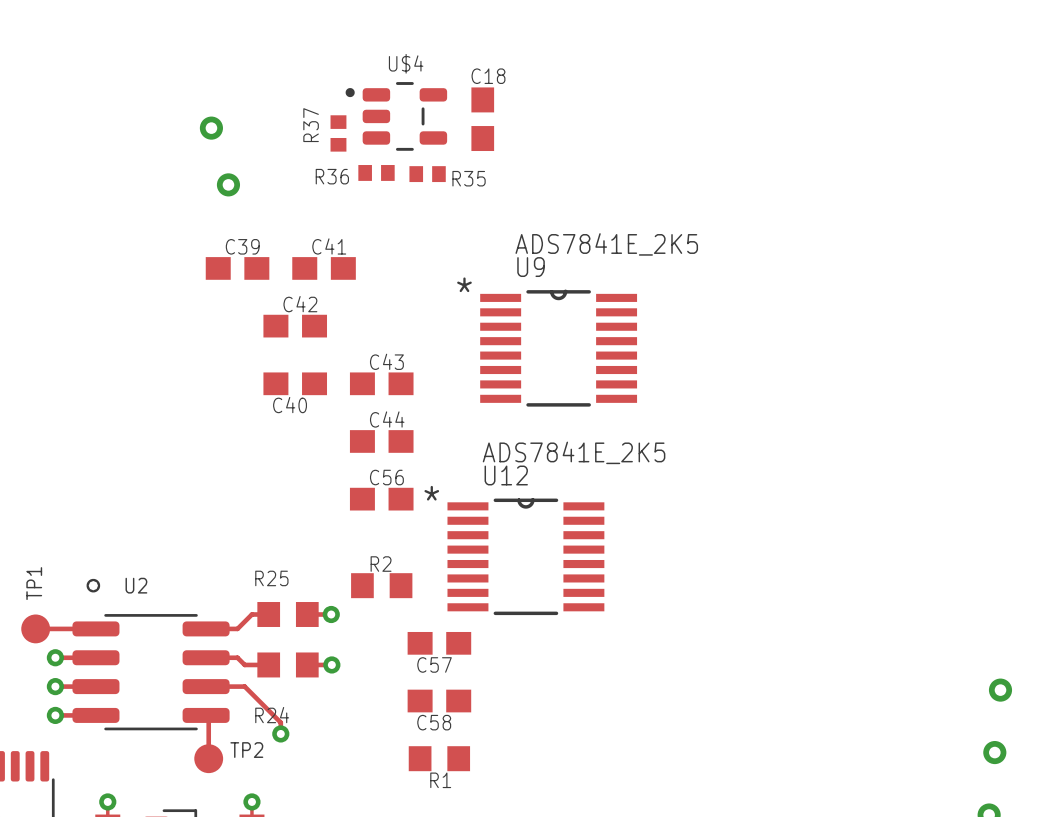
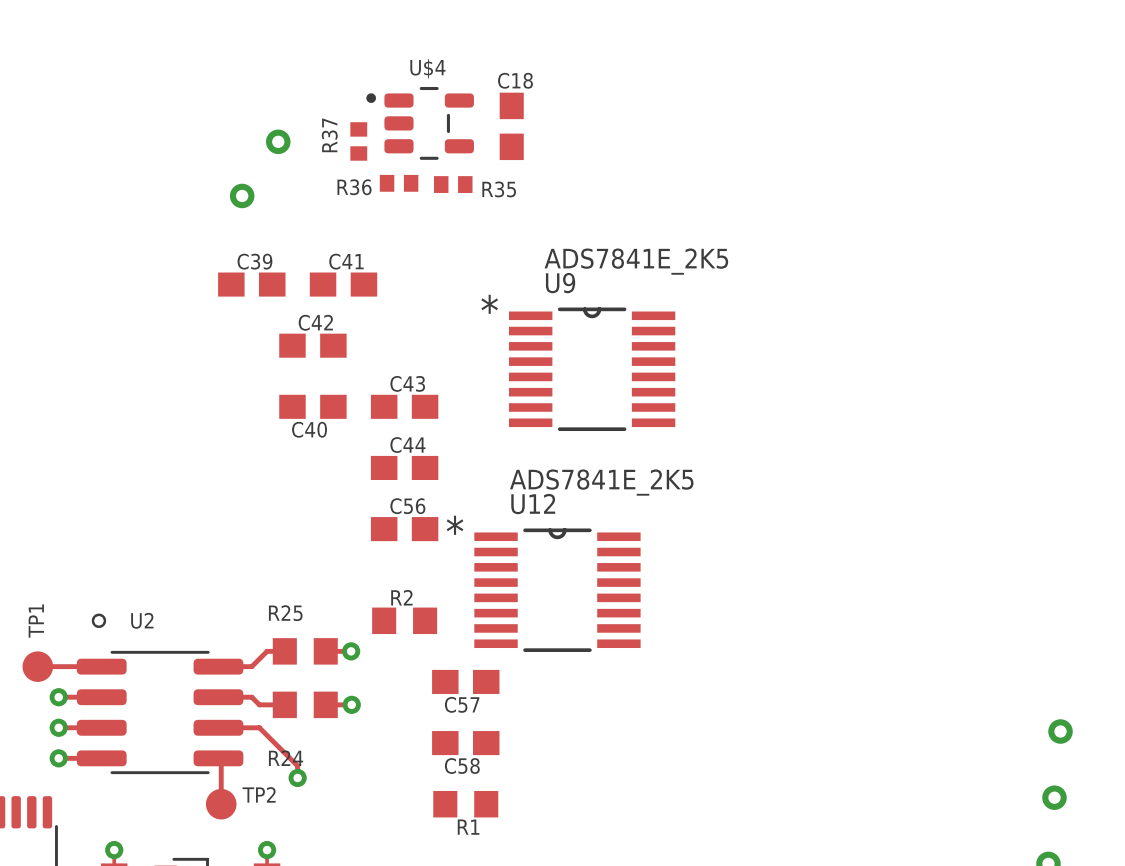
part position: (211, 128) -> (278, 141)

